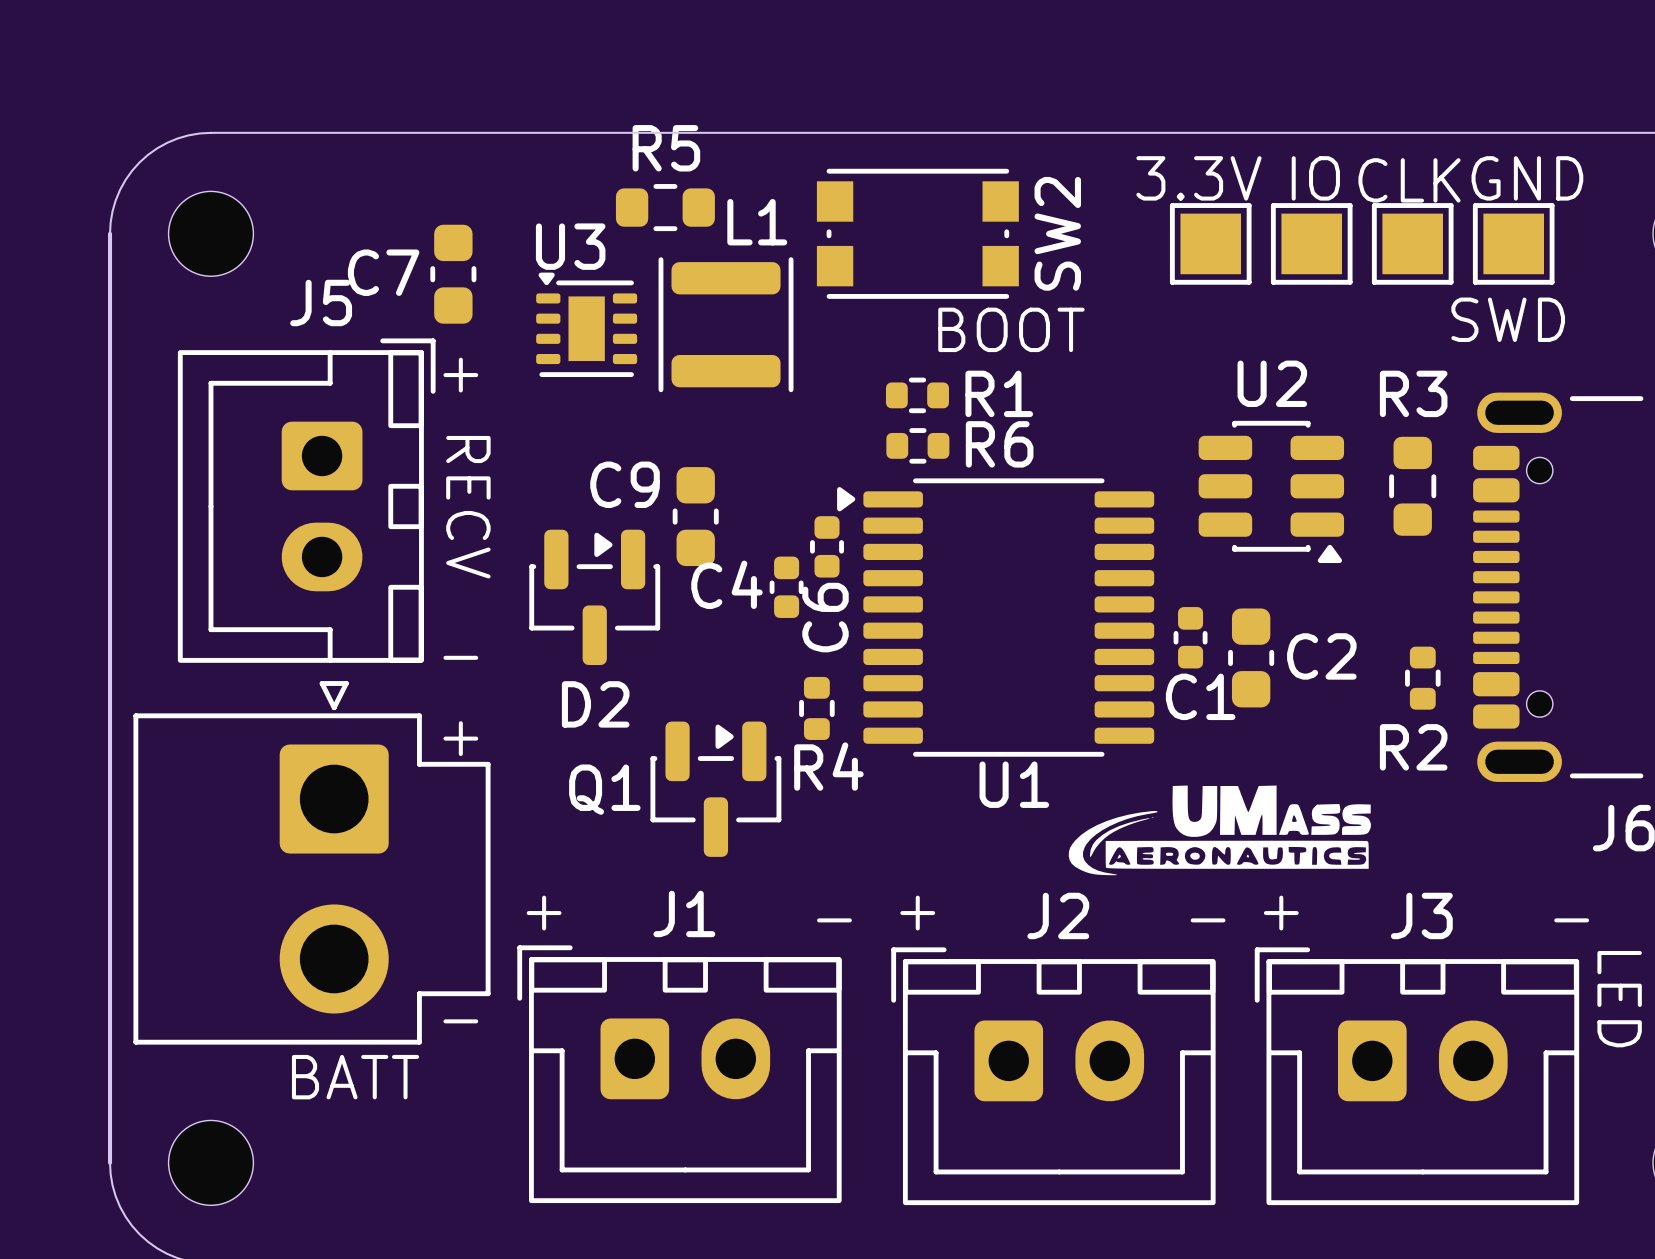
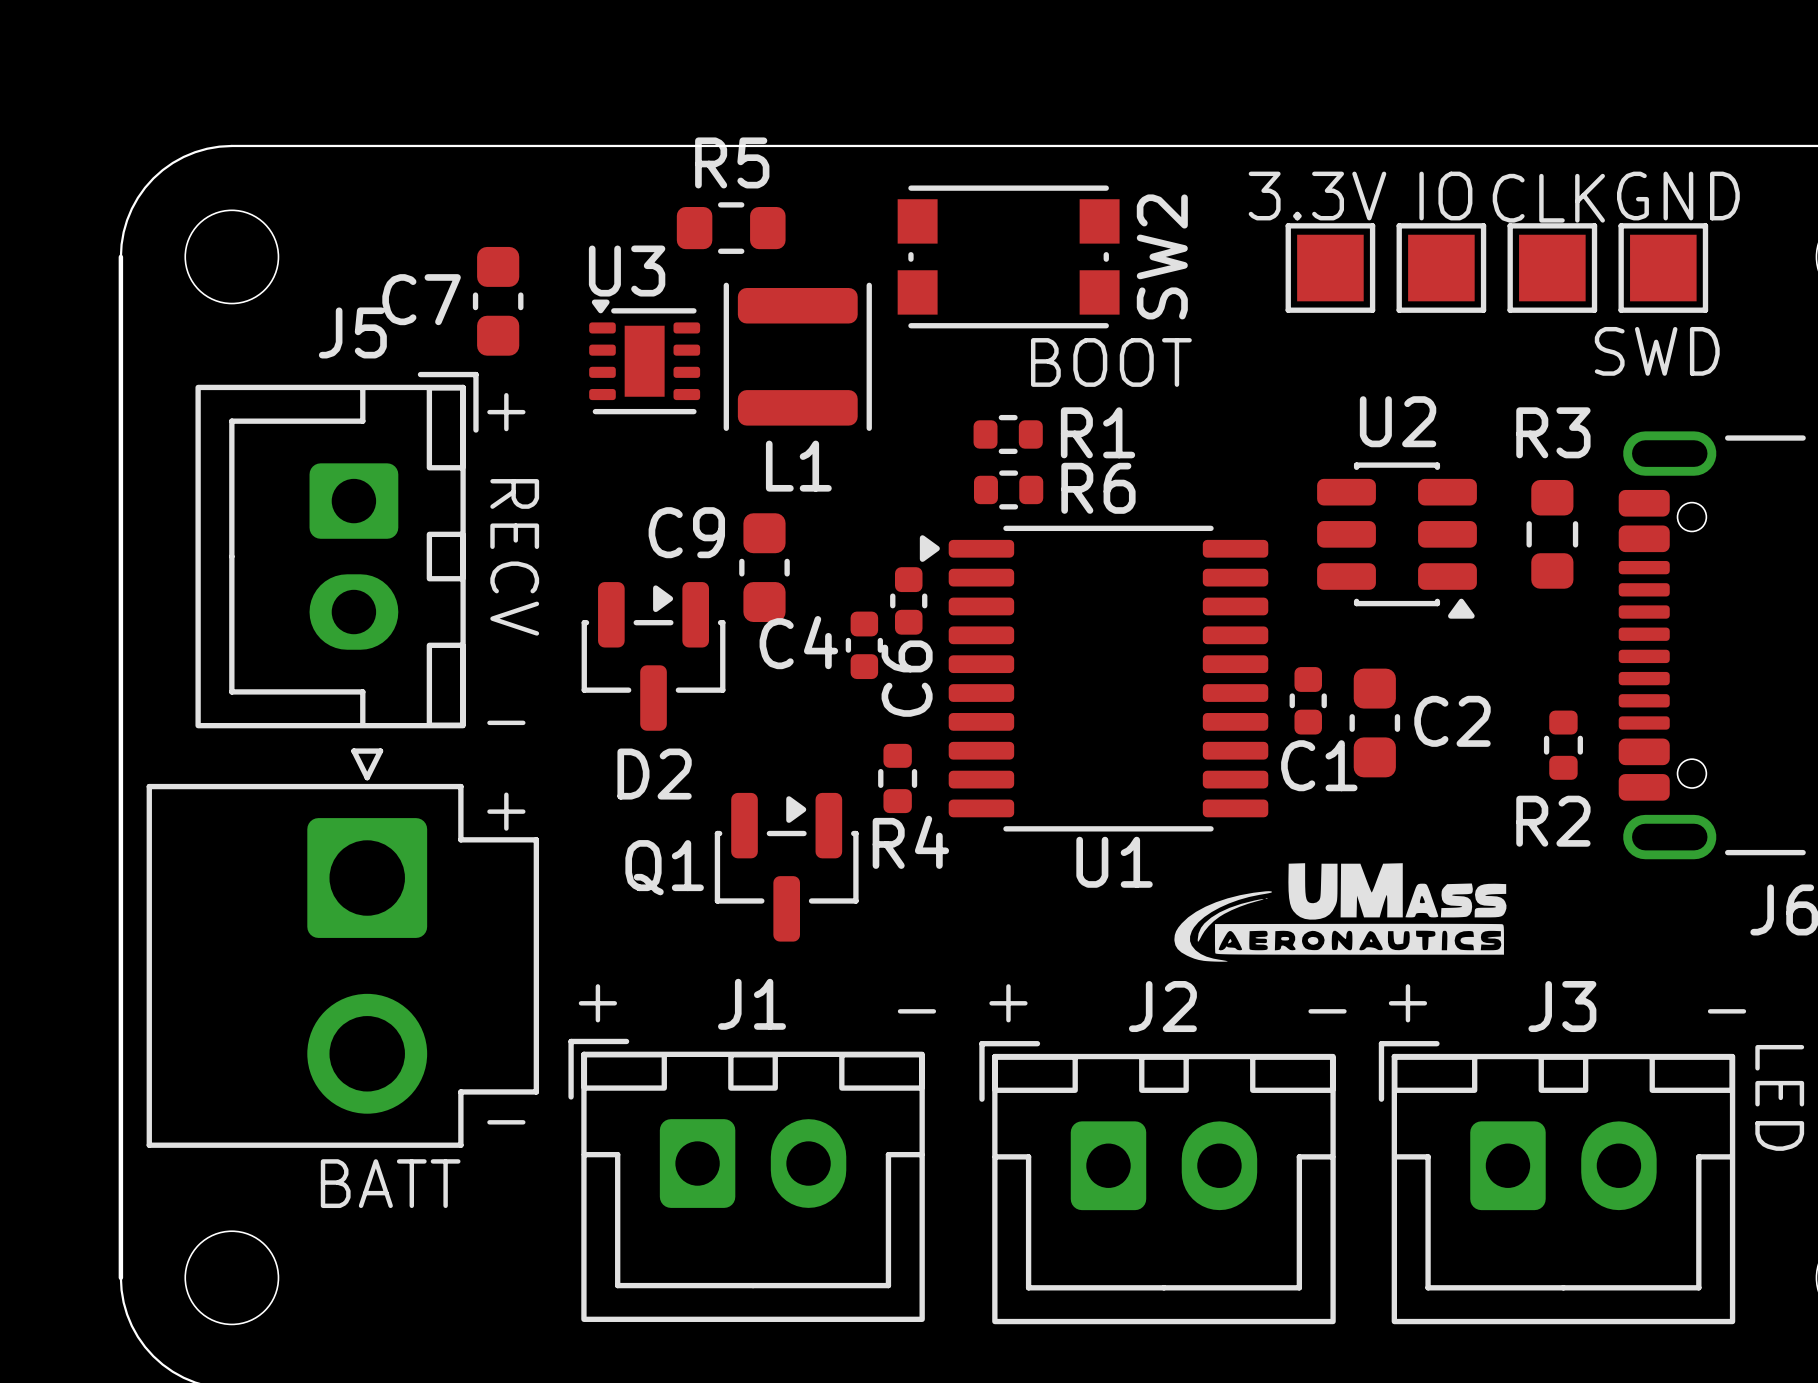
L1 name position: L1 (757, 222) -> L1 (798, 466)

